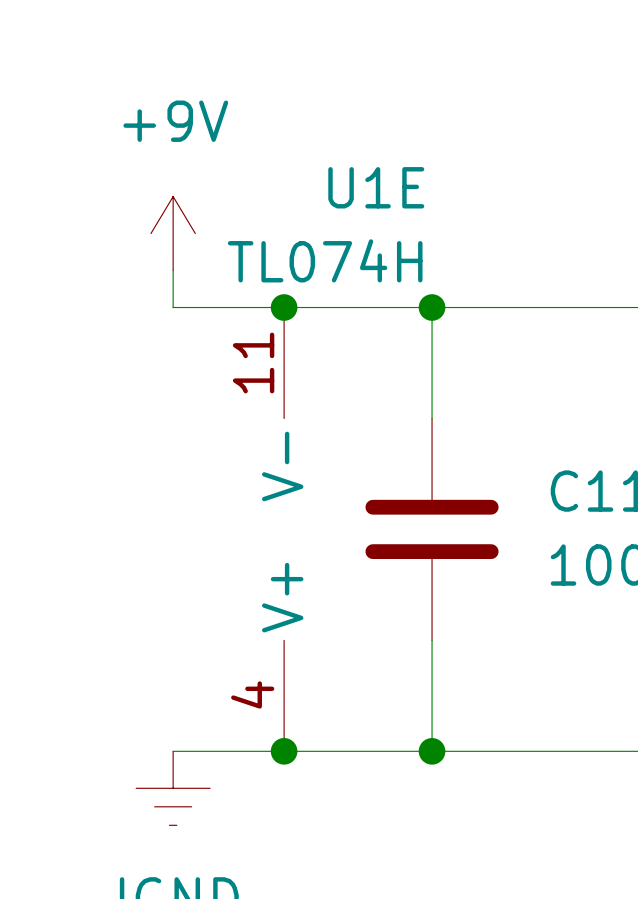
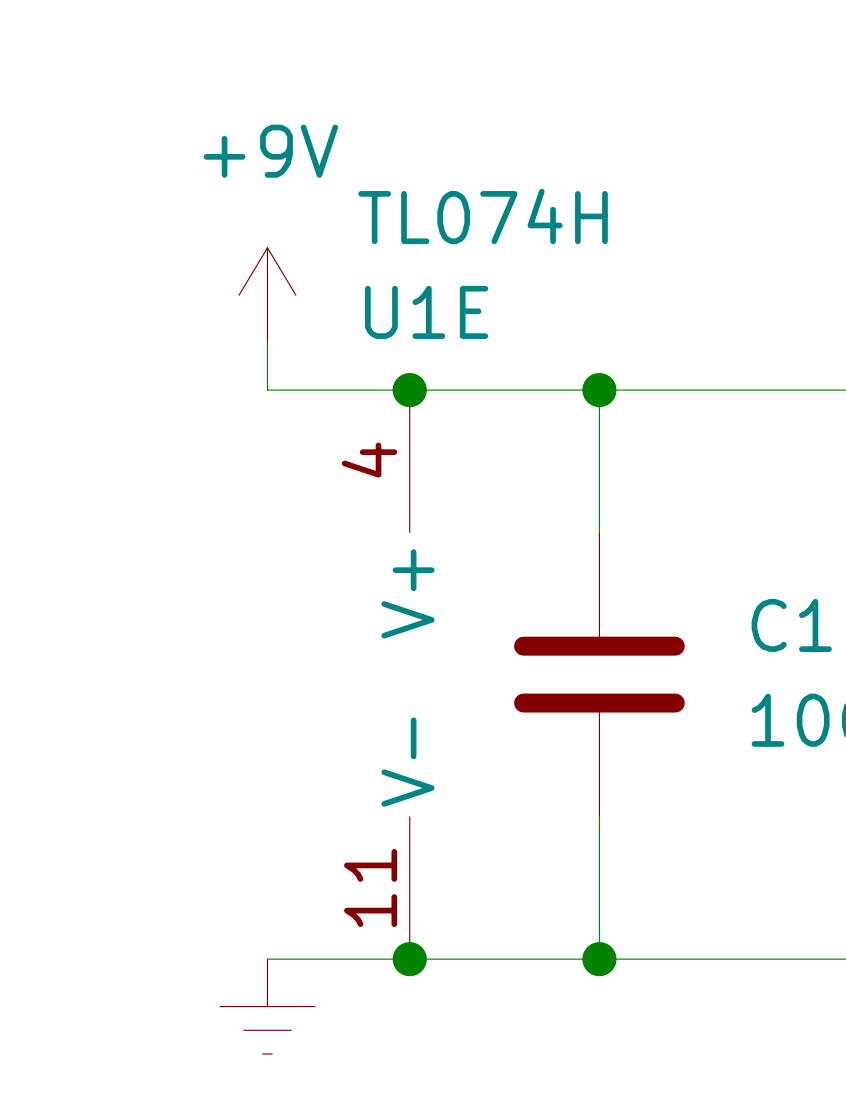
U1E name position: U1E (376, 187) -> U1E (426, 312)
U1E value position: TL074H (325, 260) -> TL074H (483, 216)
U1E rotation: 0° (284, 529) -> 180° (409, 674)

